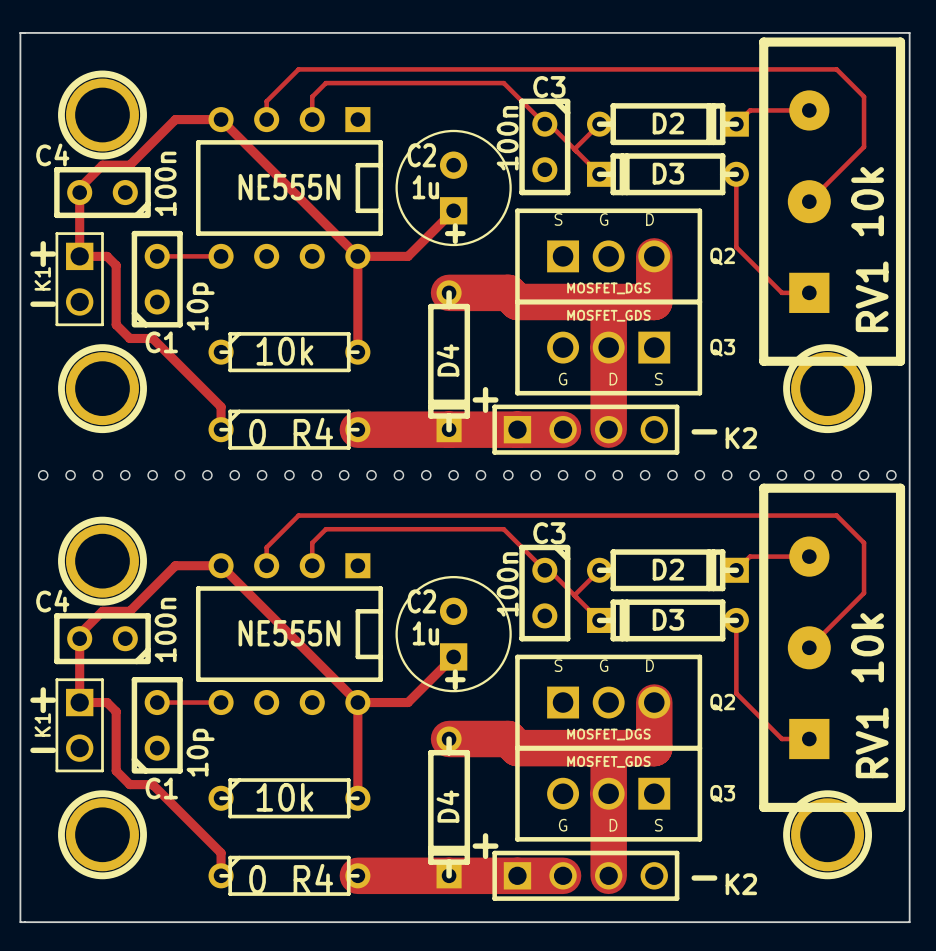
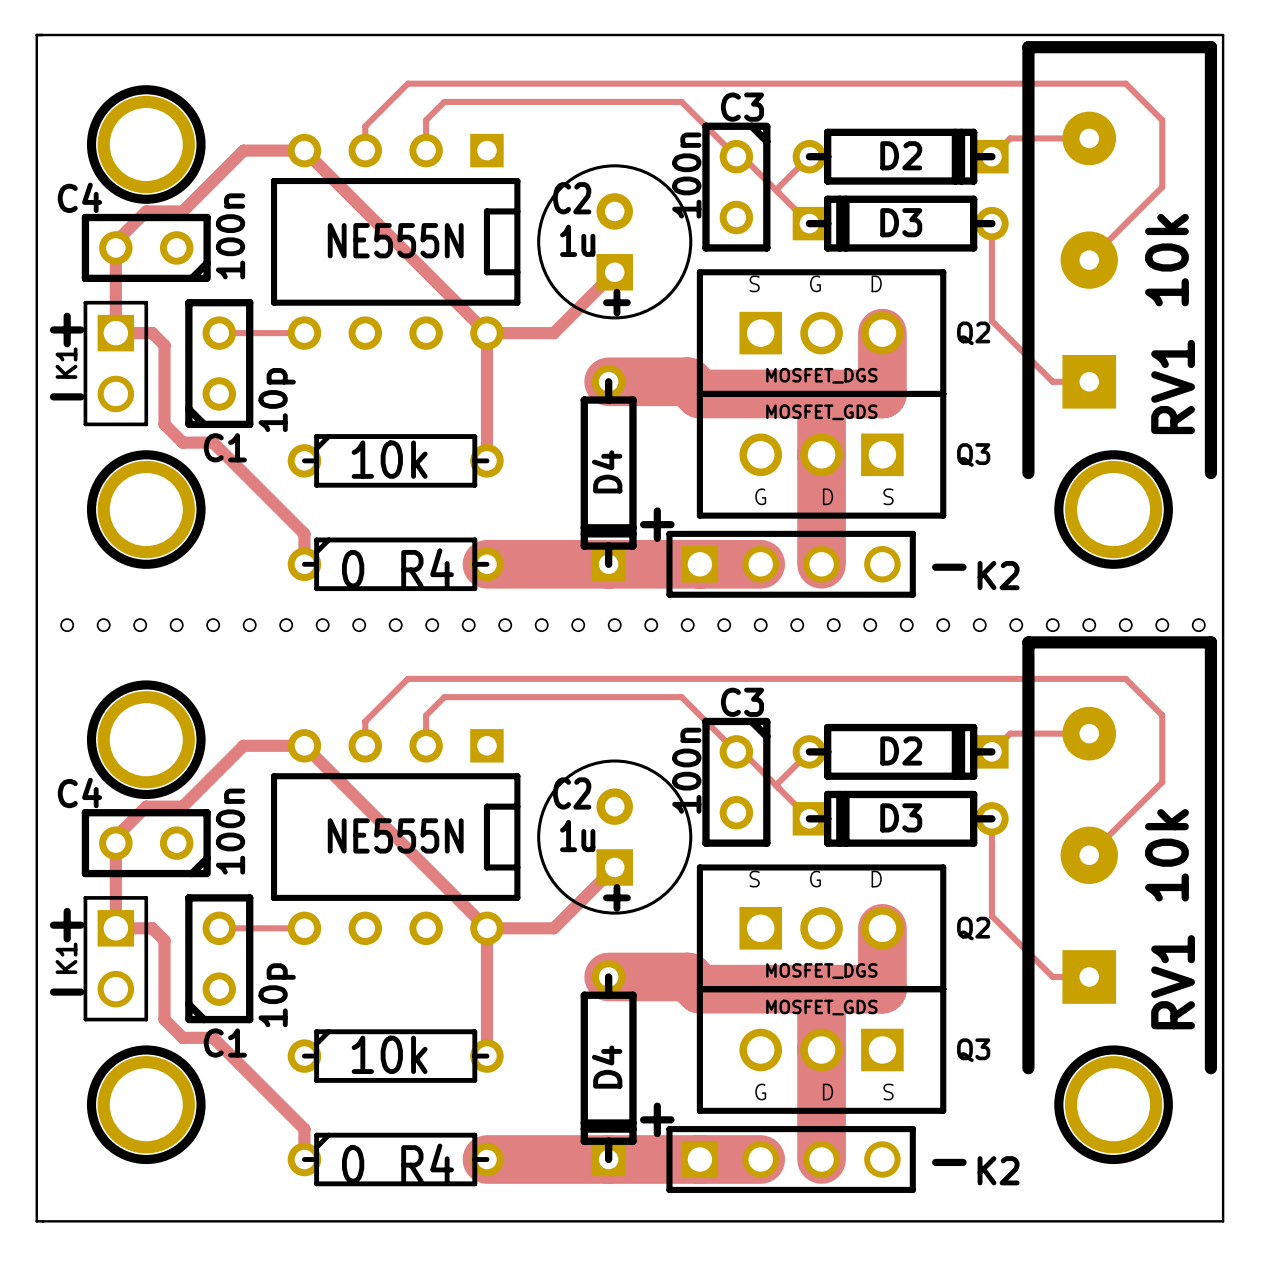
RV1 footprint: [759, 37, 906, 366] -> [1022, 41, 1218, 480]
RV1 footprint: [759, 483, 906, 812] -> [1022, 636, 1218, 1075]

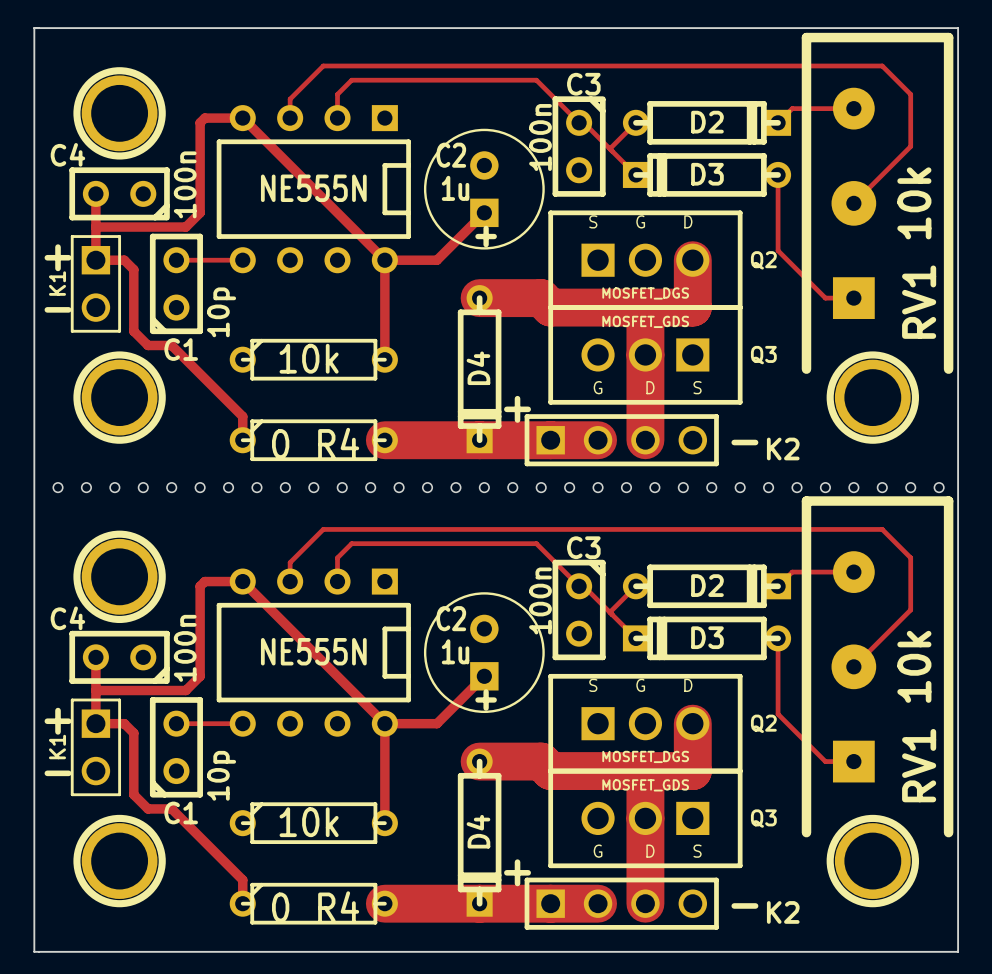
track: (255, 150) (243, 150) (182, 211) (146, 211) (115, 241) (115, 247) -> (204, 118) (200, 122) (200, 212) (185, 227) (95, 227)
track: (255, 745) (243, 745) (182, 806) (146, 806) (115, 837) (115, 843) -> (204, 581) (200, 586) (200, 676) (185, 690) (95, 690)

